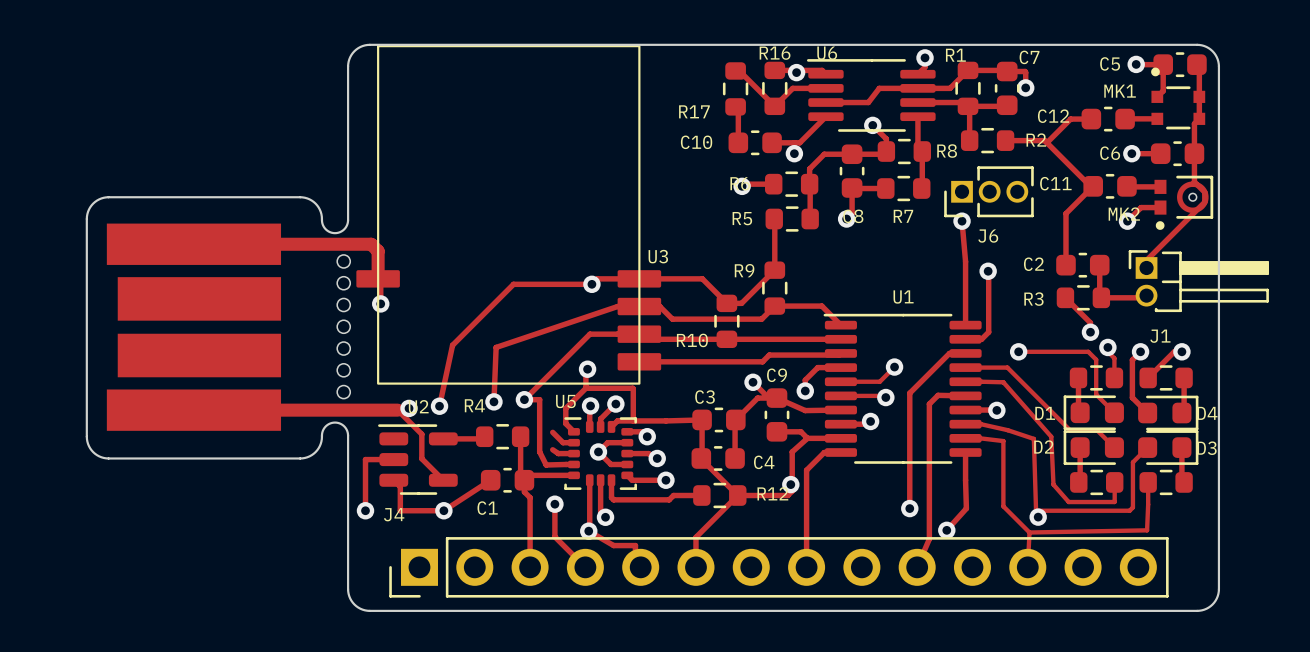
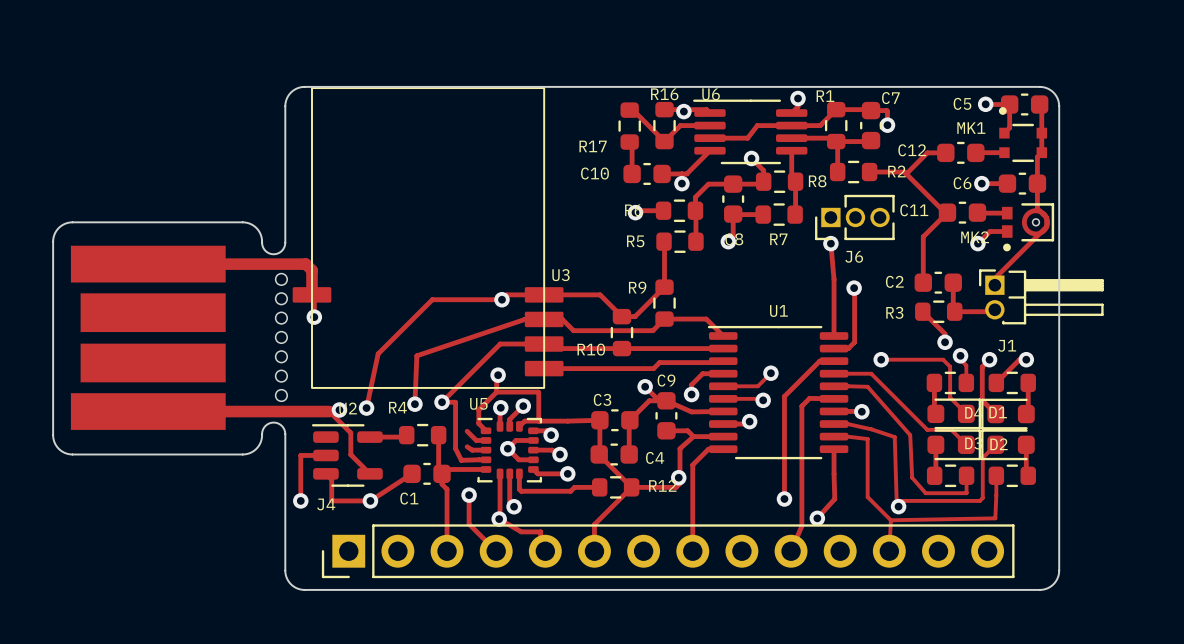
D1 rotation: 0° (1093, 412) -> 180° (954, 413)
D4 rotation: 0° (1168, 412) -> 180° (1007, 414)
D2 rotation: 0° (1093, 447) -> 180° (954, 444)
D3 rotation: 0° (1168, 447) -> 180° (1007, 444)

